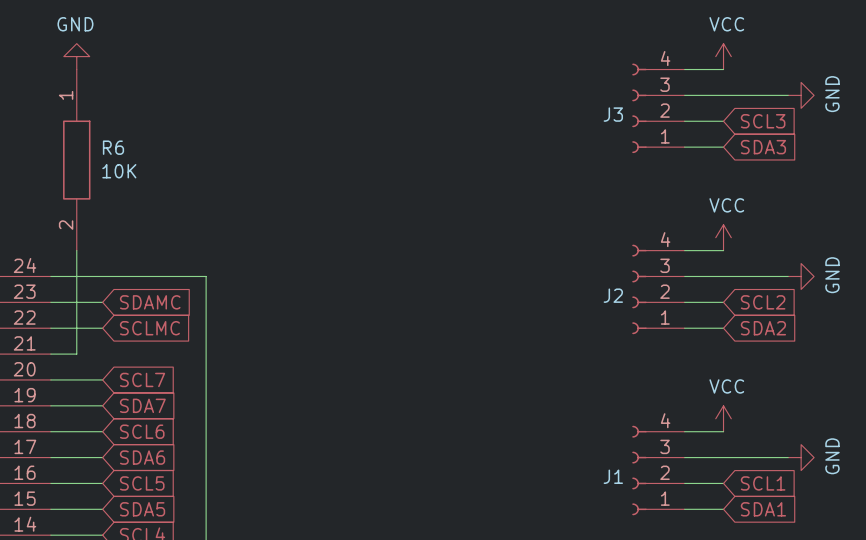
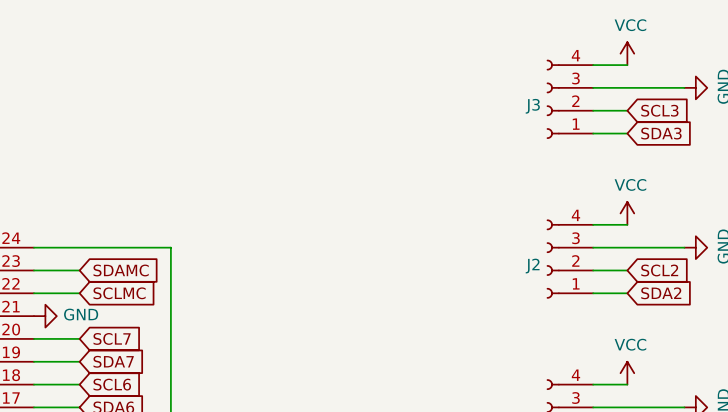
power symbol: GND (76, 56) -> none
R6: 10K (76, 160) -> none
wire: (76, 250) (76, 354) (50, 354) -> none
power symbol: none -> GND (45, 316)

